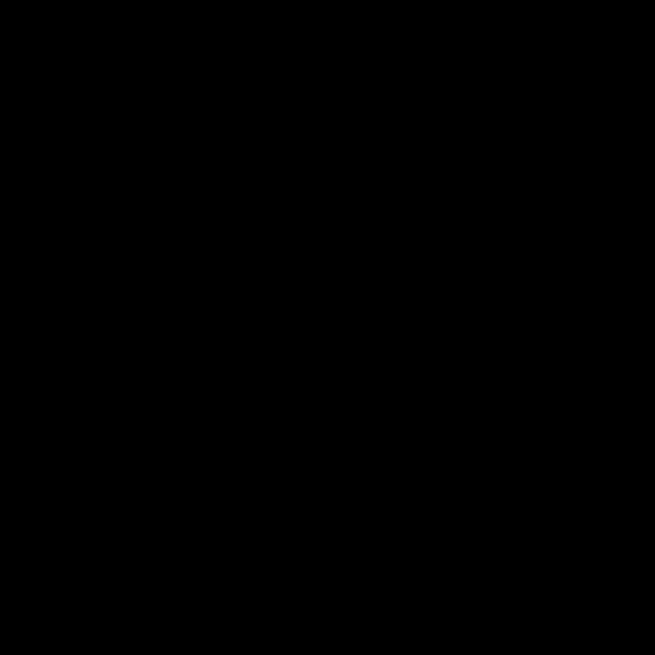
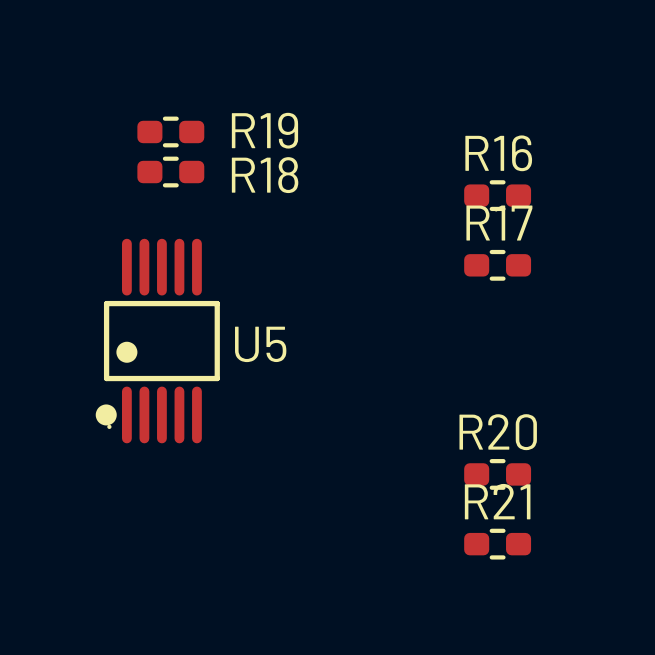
R19: none -> (170, 131)
R18: none -> (170, 172)
R16: none -> (497, 195)
R17: none -> (497, 265)
U5: none -> (157, 341)
R20: none -> (497, 474)
R21: none -> (497, 544)

